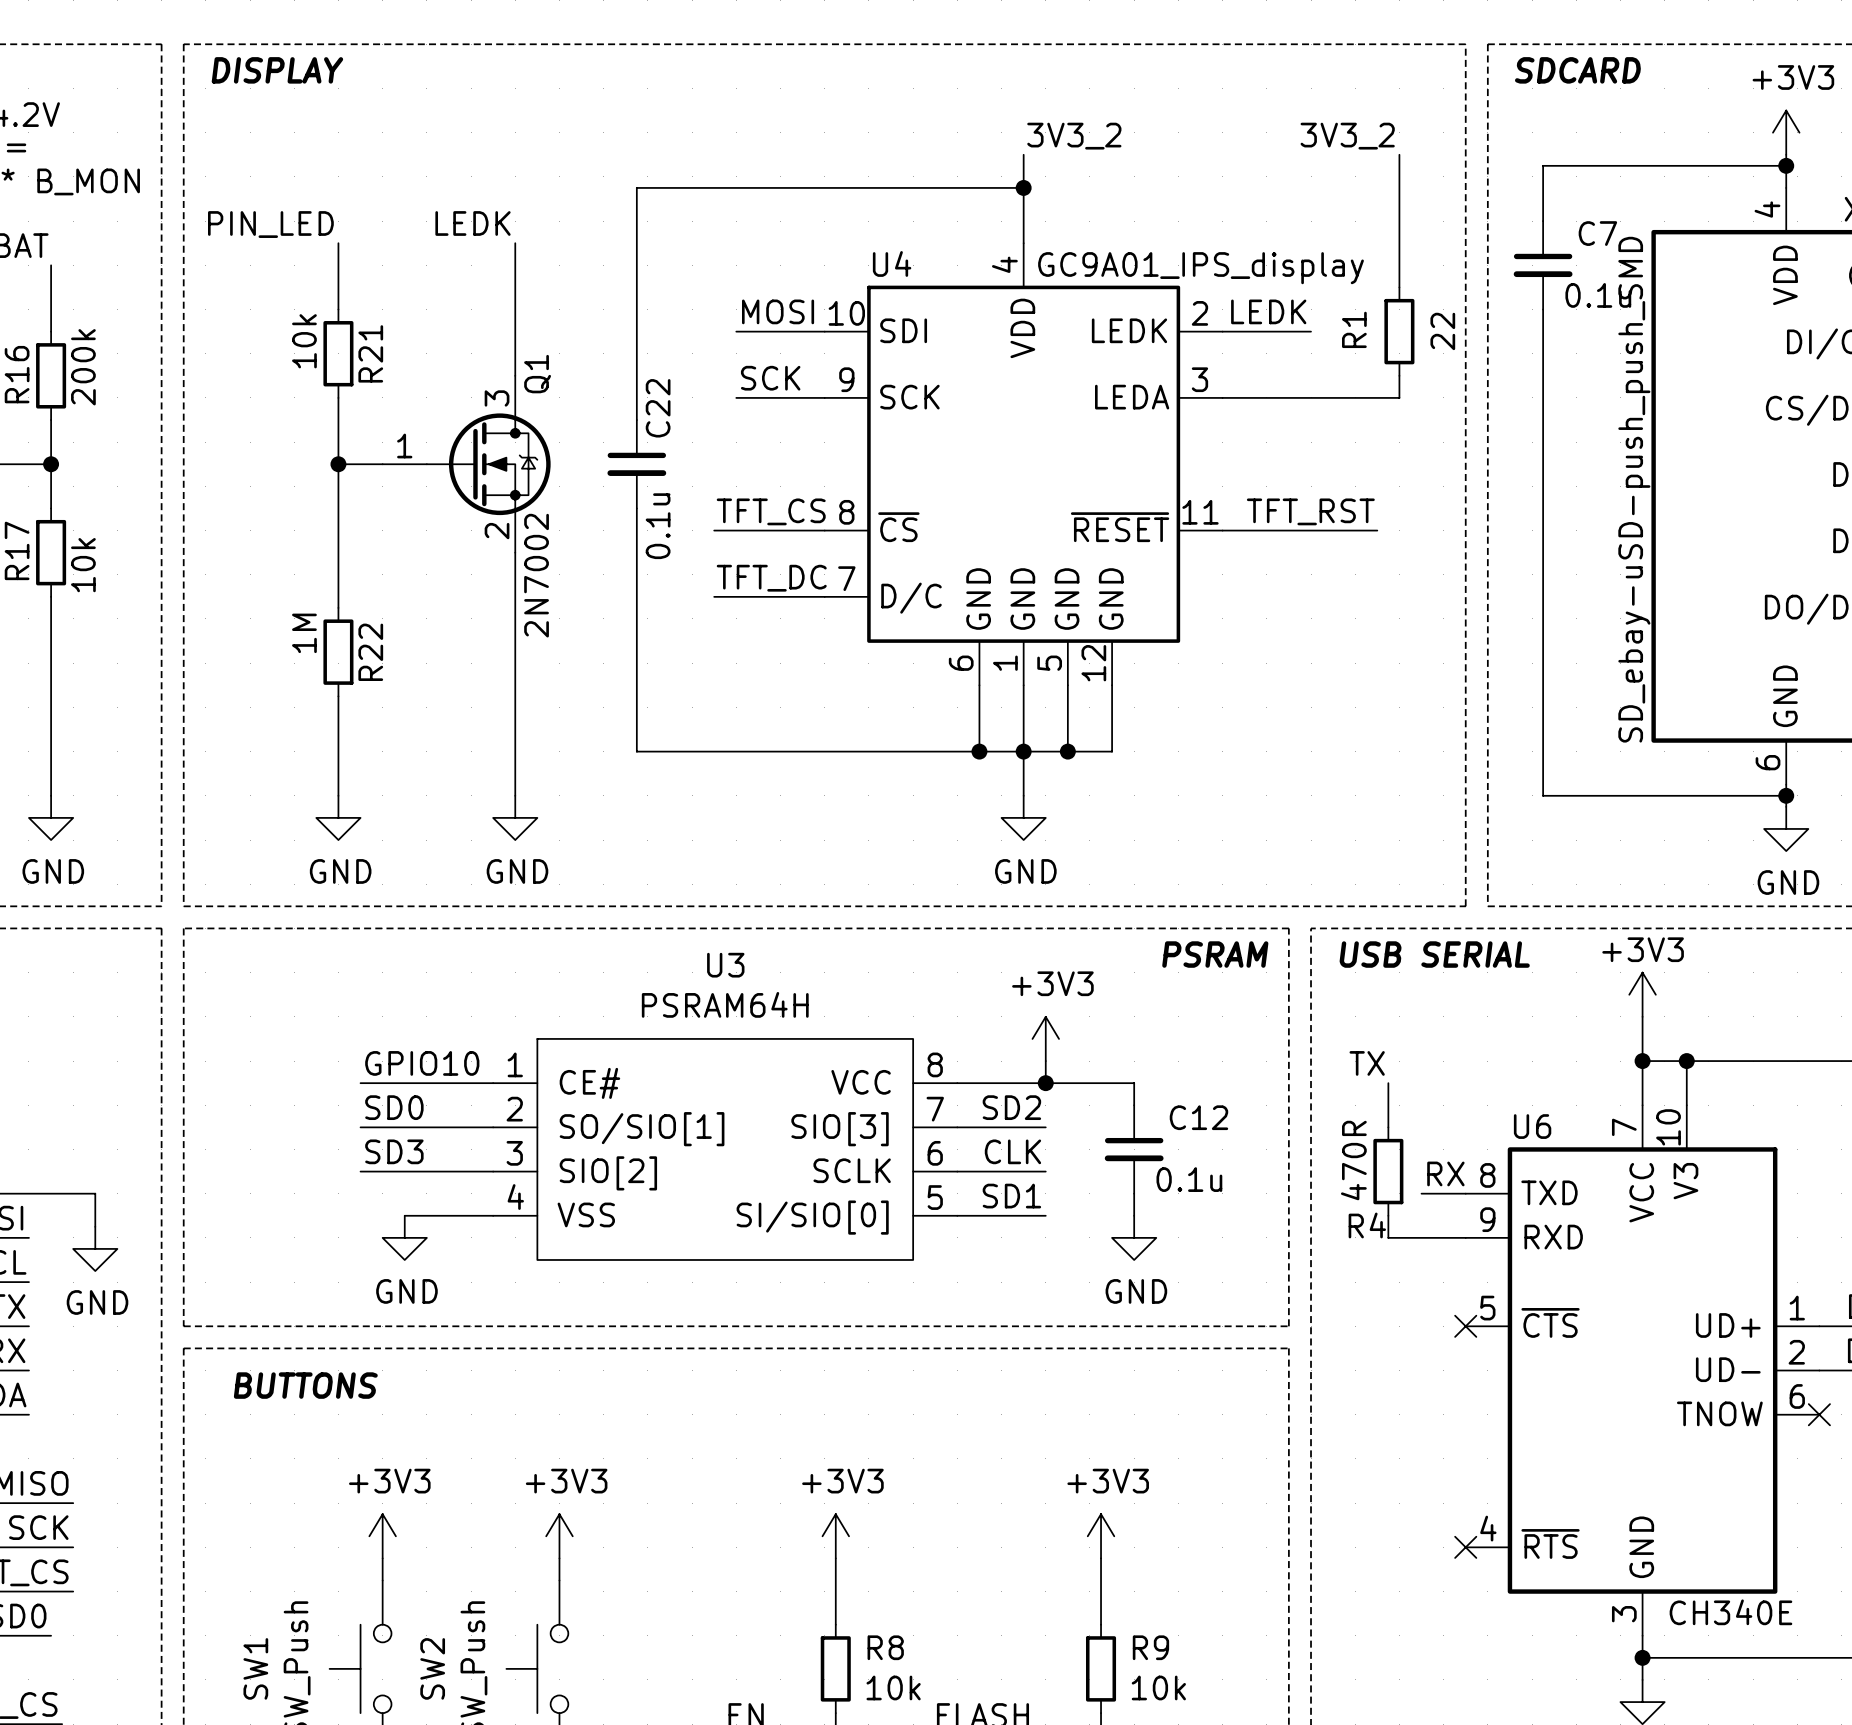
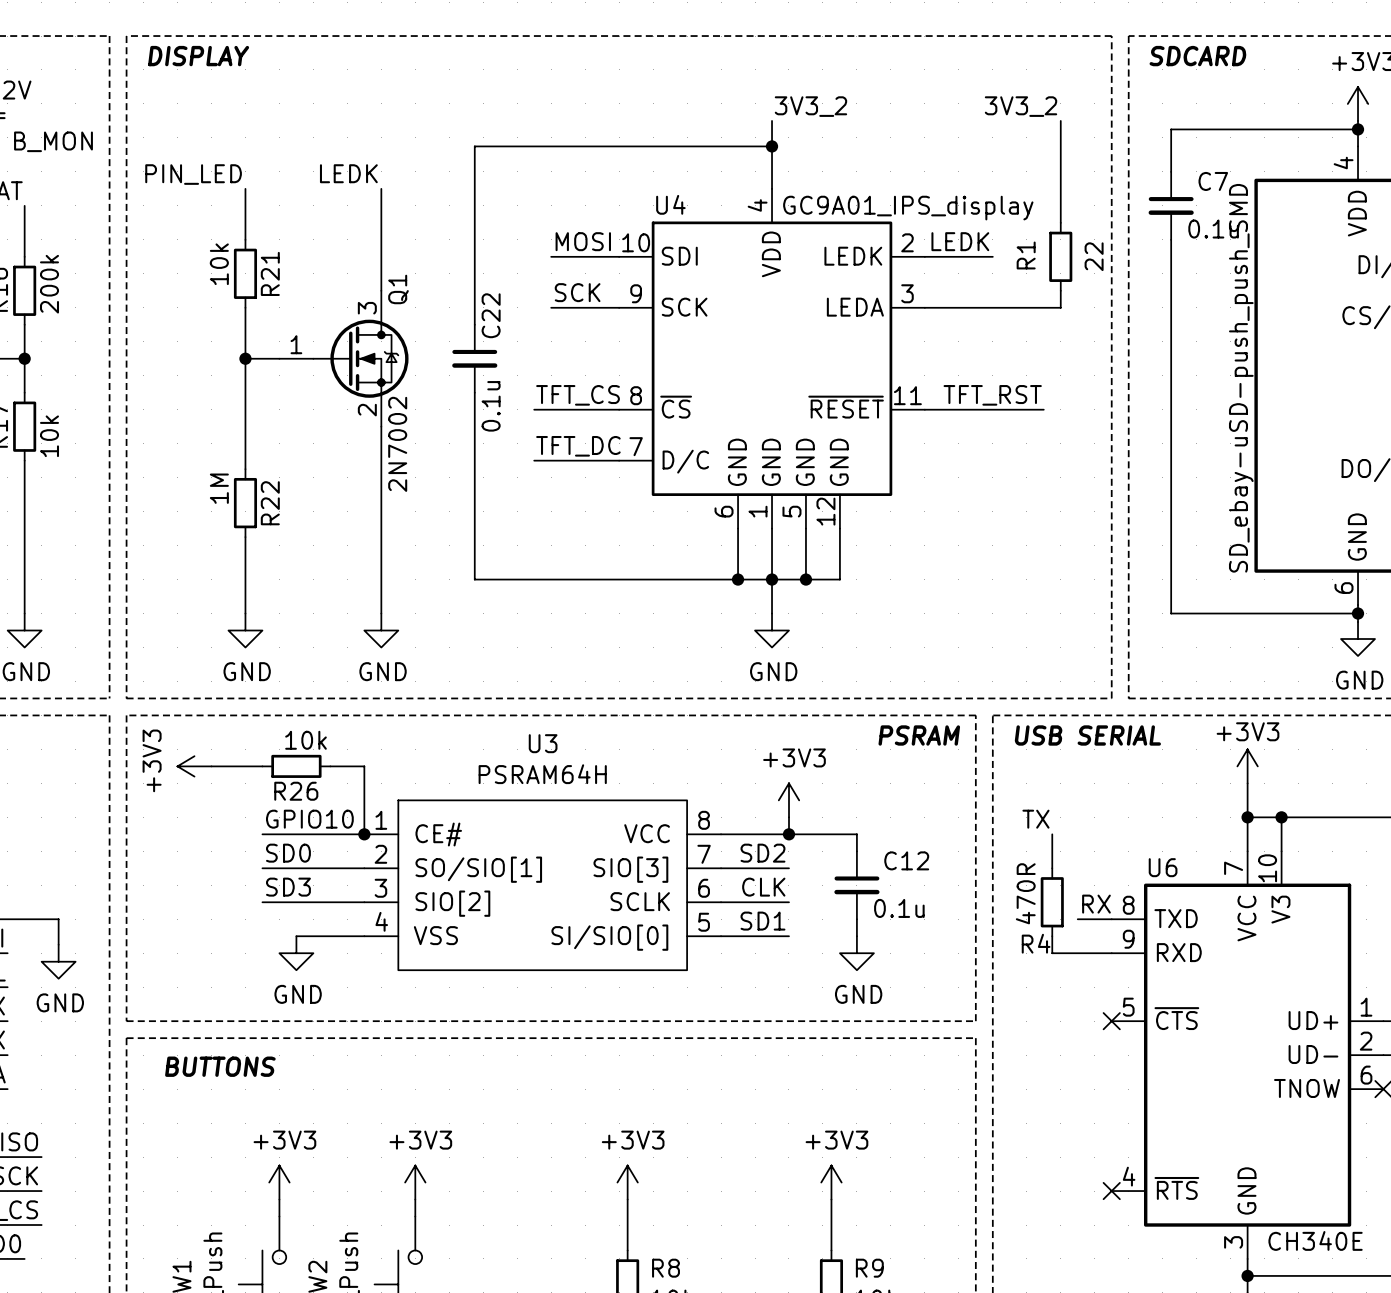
power symbol: none -> +3V3 (194, 766)
wire: none -> (211, 766) (262, 766)
R26: none -> 10k (296, 766)
wire: none -> (330, 766) (364, 766) (364, 834)
junction: none -> (364, 834)

